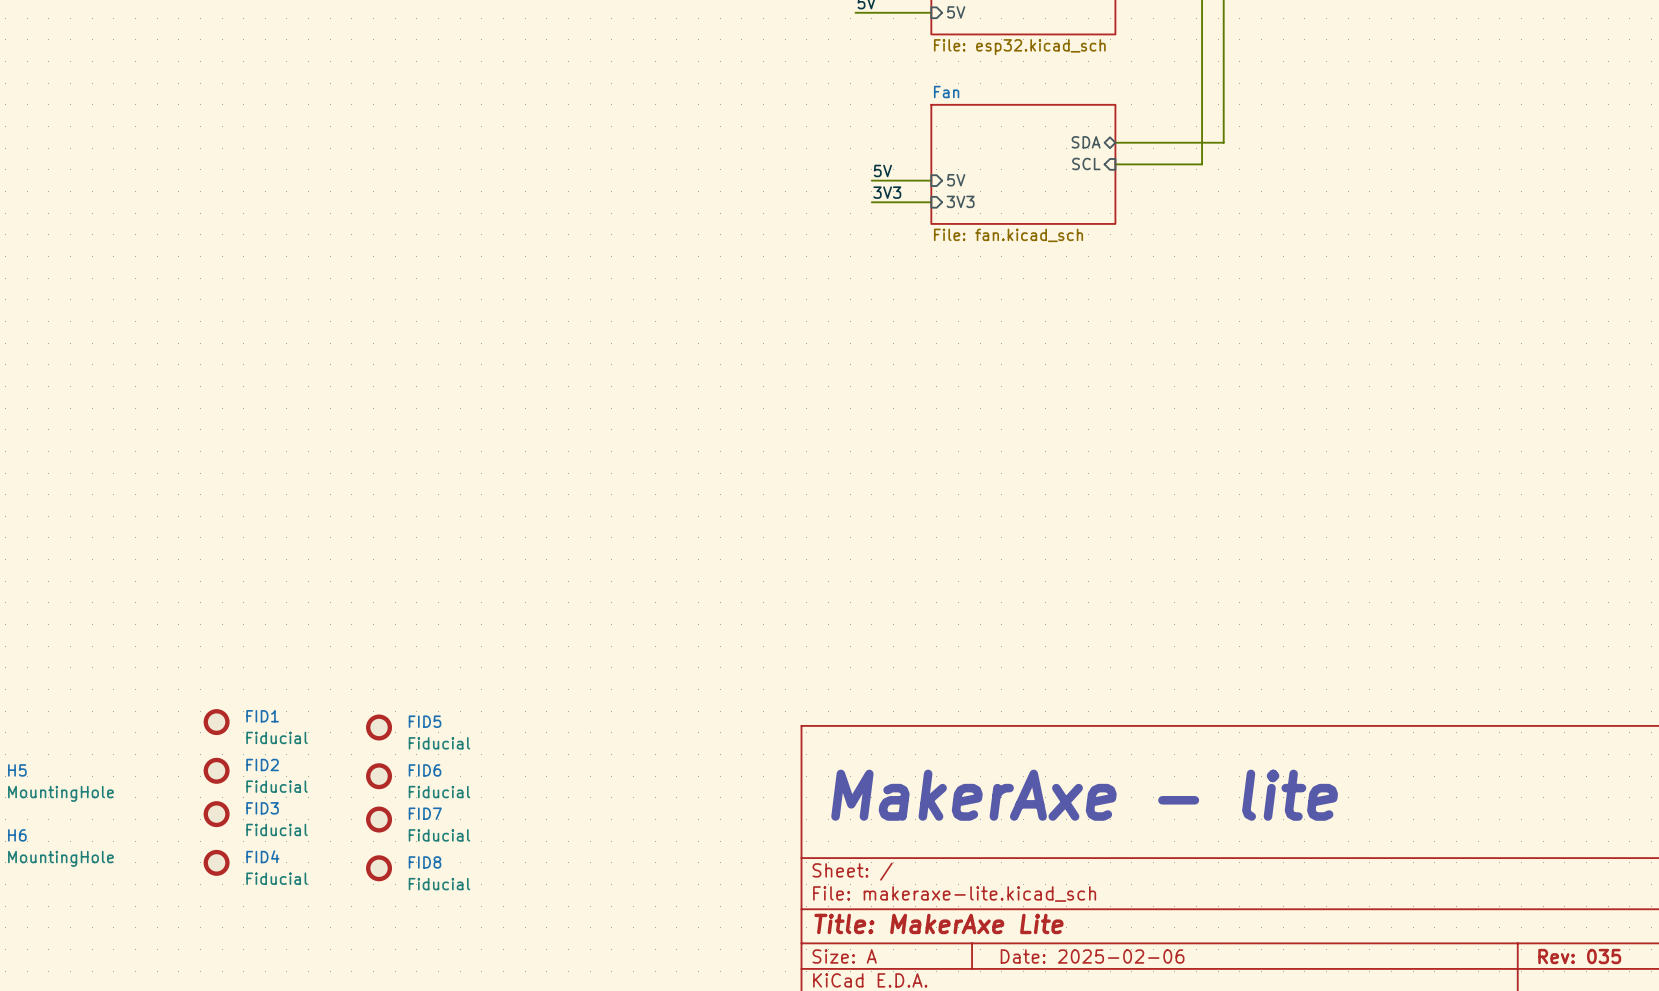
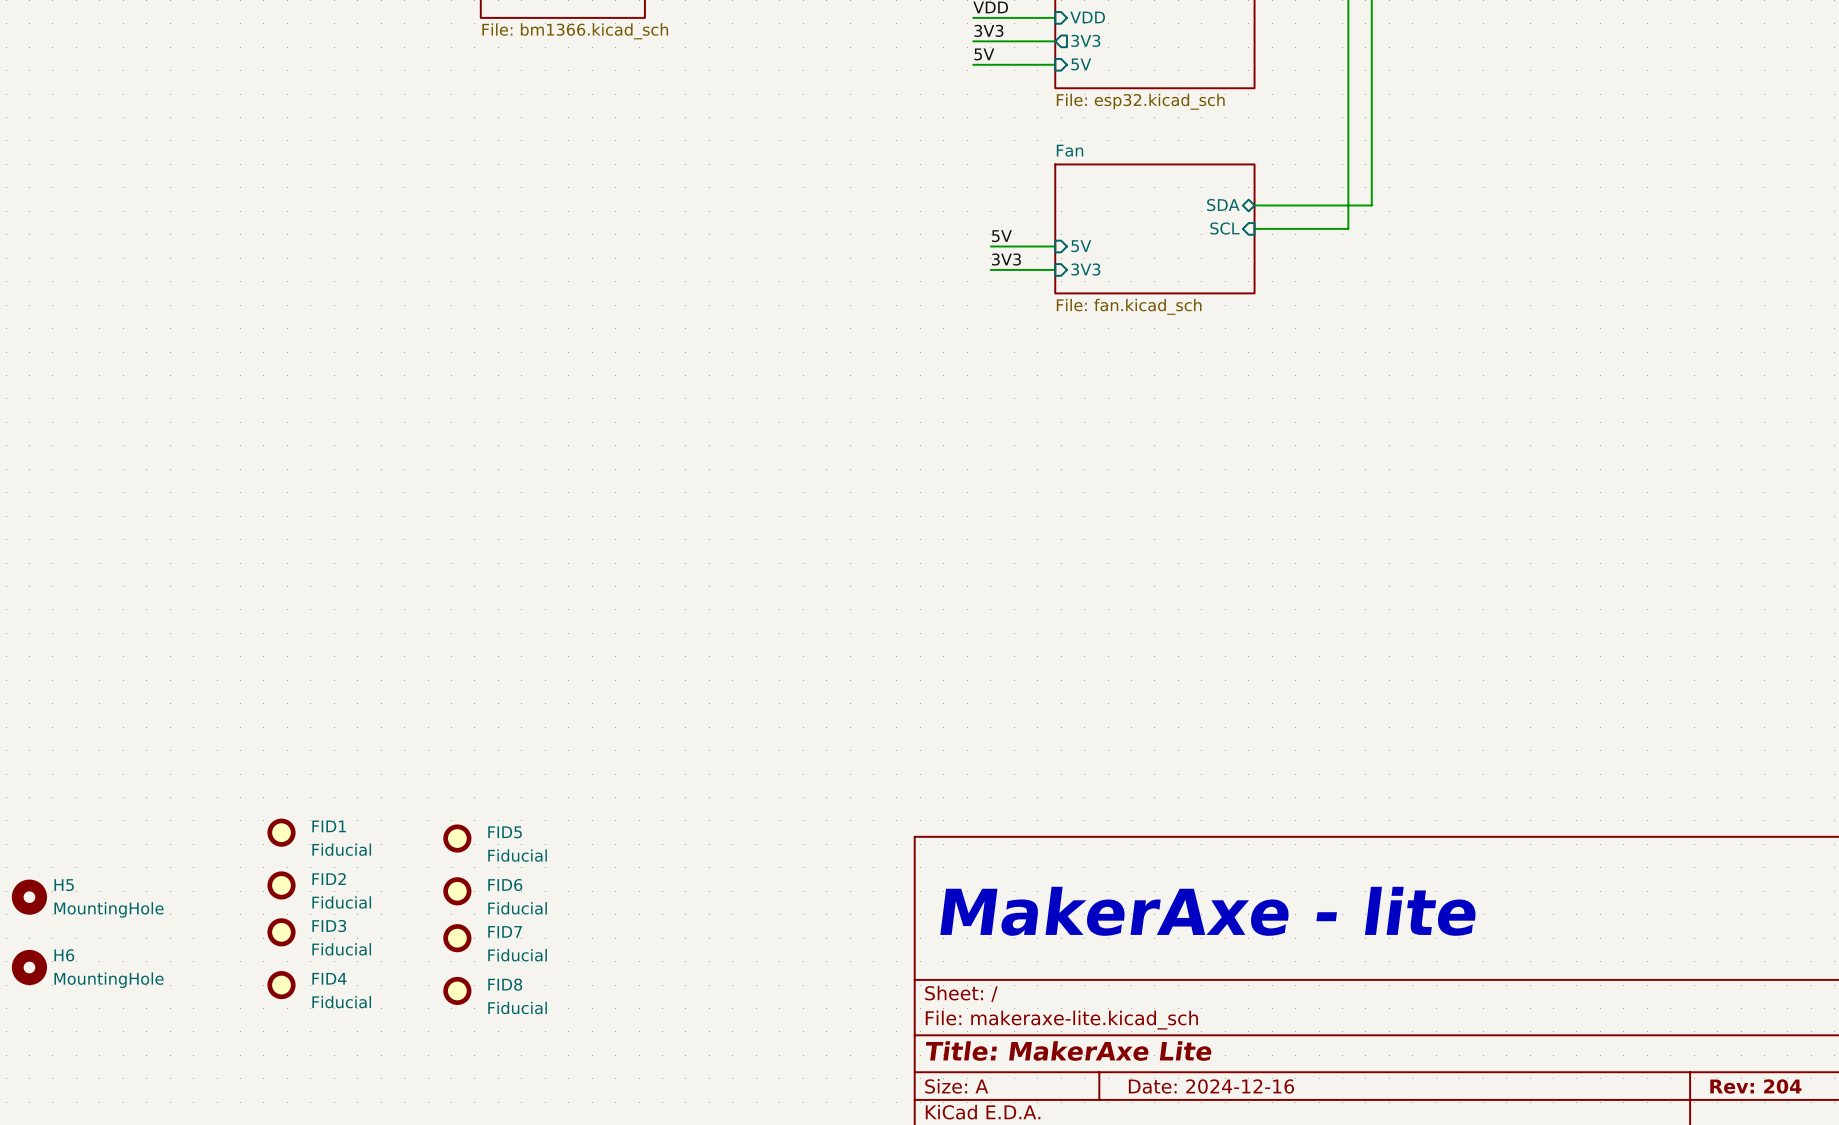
title block: Date: 2025-02-06 (1092, 956) -> Date: 2024-12-16 (1211, 1086)
title block: Rev: 035 (1579, 956) -> Rev: 204 (1755, 1086)

